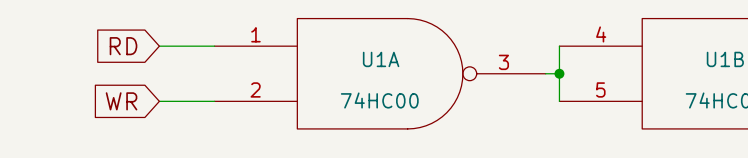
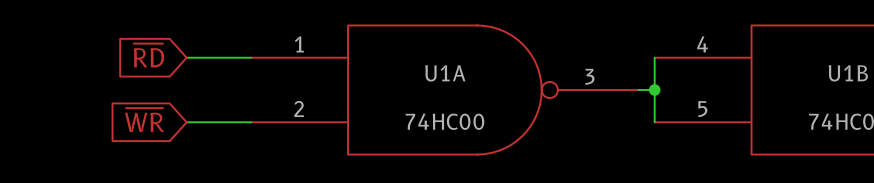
global label: RD (123, 46) -> ~{RD} (148, 55)
global label: WR (121, 101) -> ~{WR} (144, 120)

